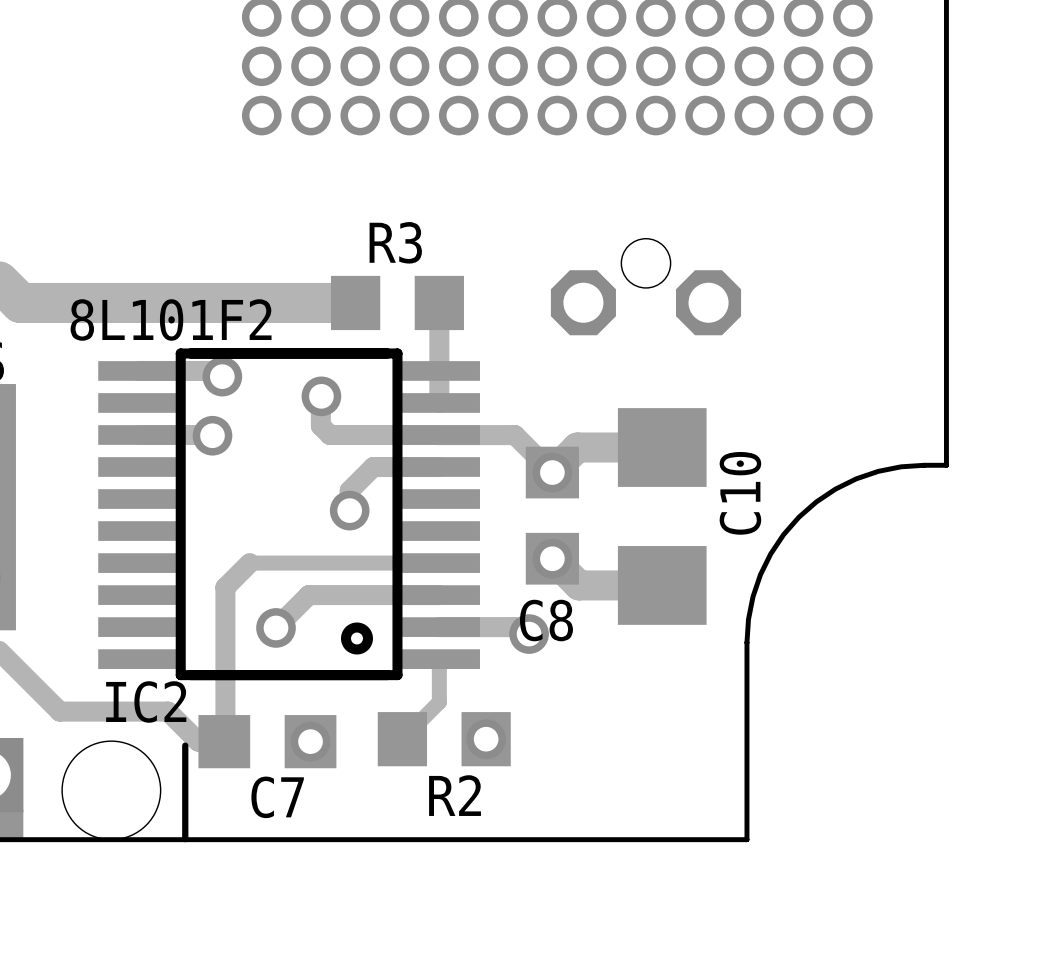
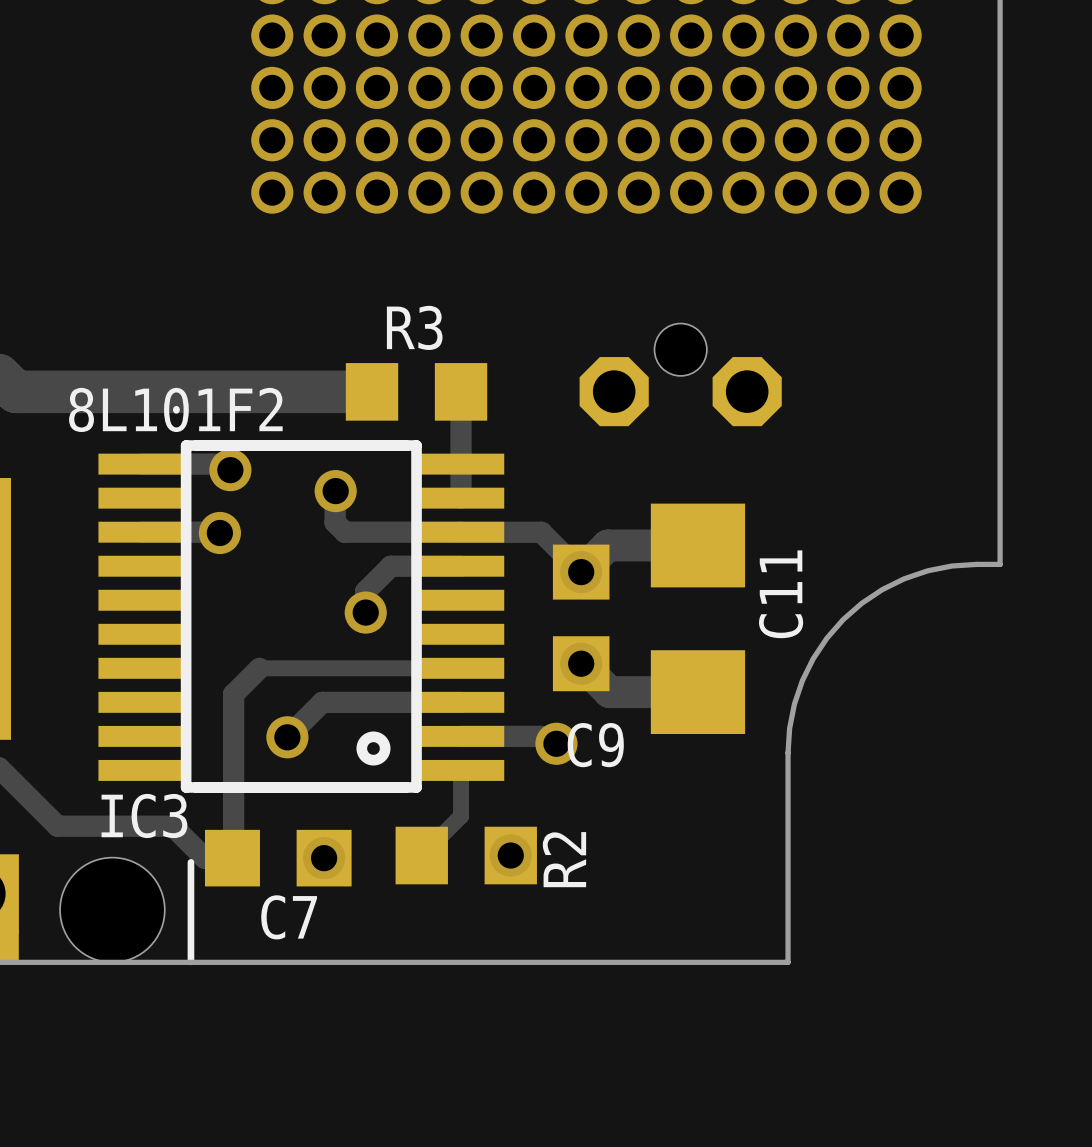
C10 name: C10 (740, 493) -> C11 (781, 594)
C8 name: C8 (546, 620) -> C9 (595, 745)
IC2 name: IC2 (146, 701) -> IC3 (144, 815)
R2 name rotation: 0° (455, 795) -> 90° counterclockwise (564, 859)
R2 name position: R2 (455, 795) -> R2 (564, 859)

